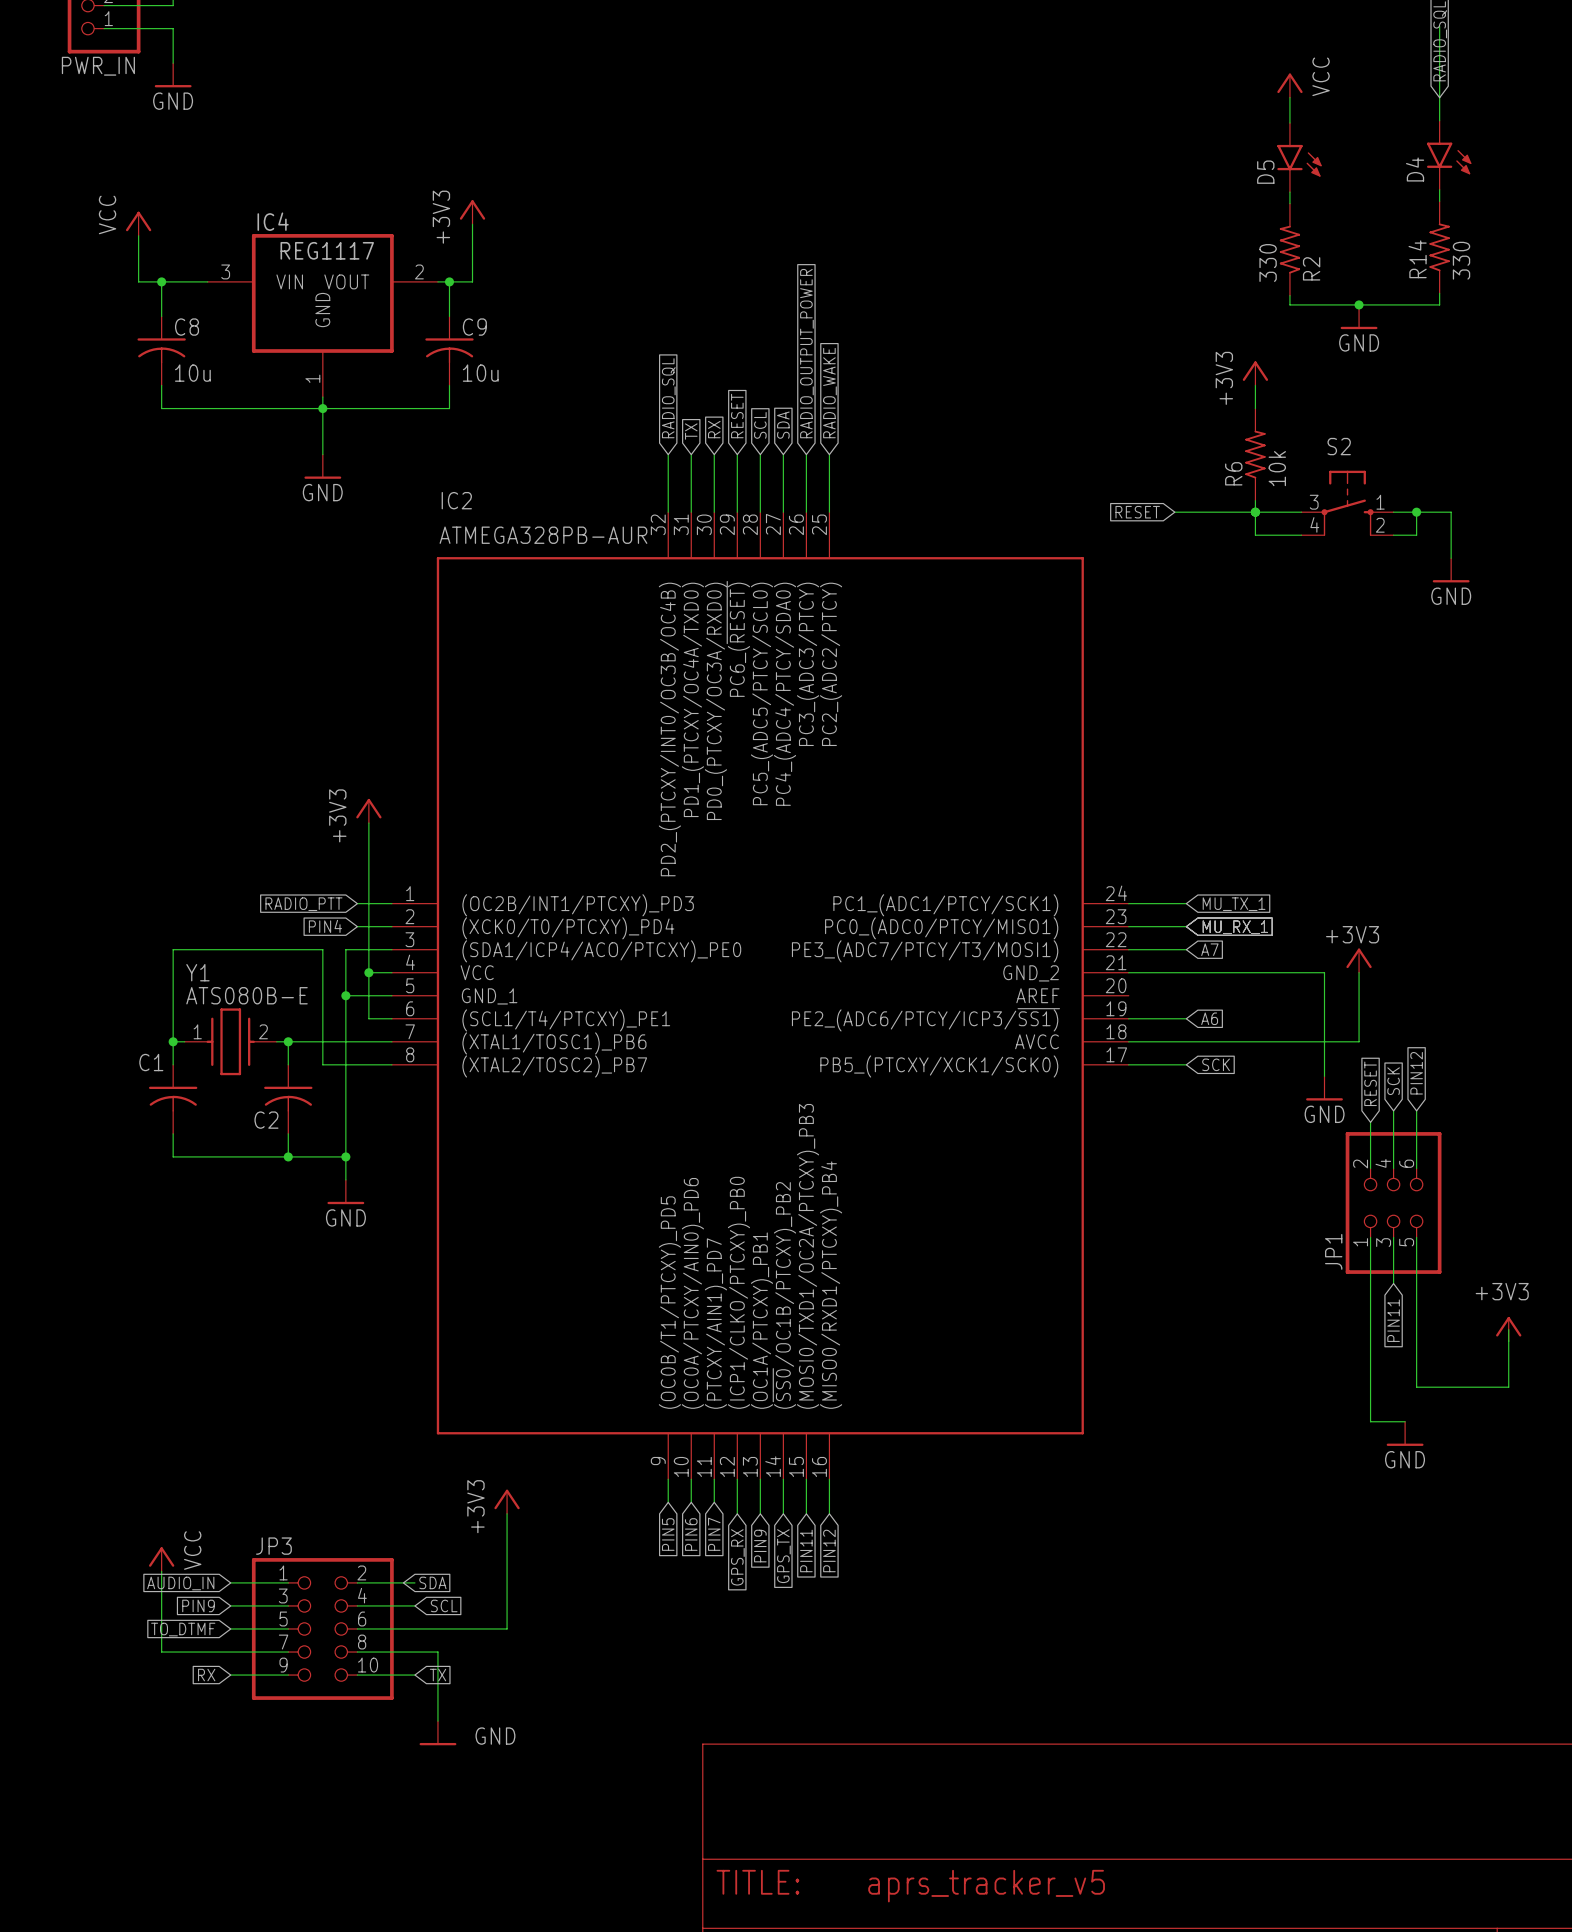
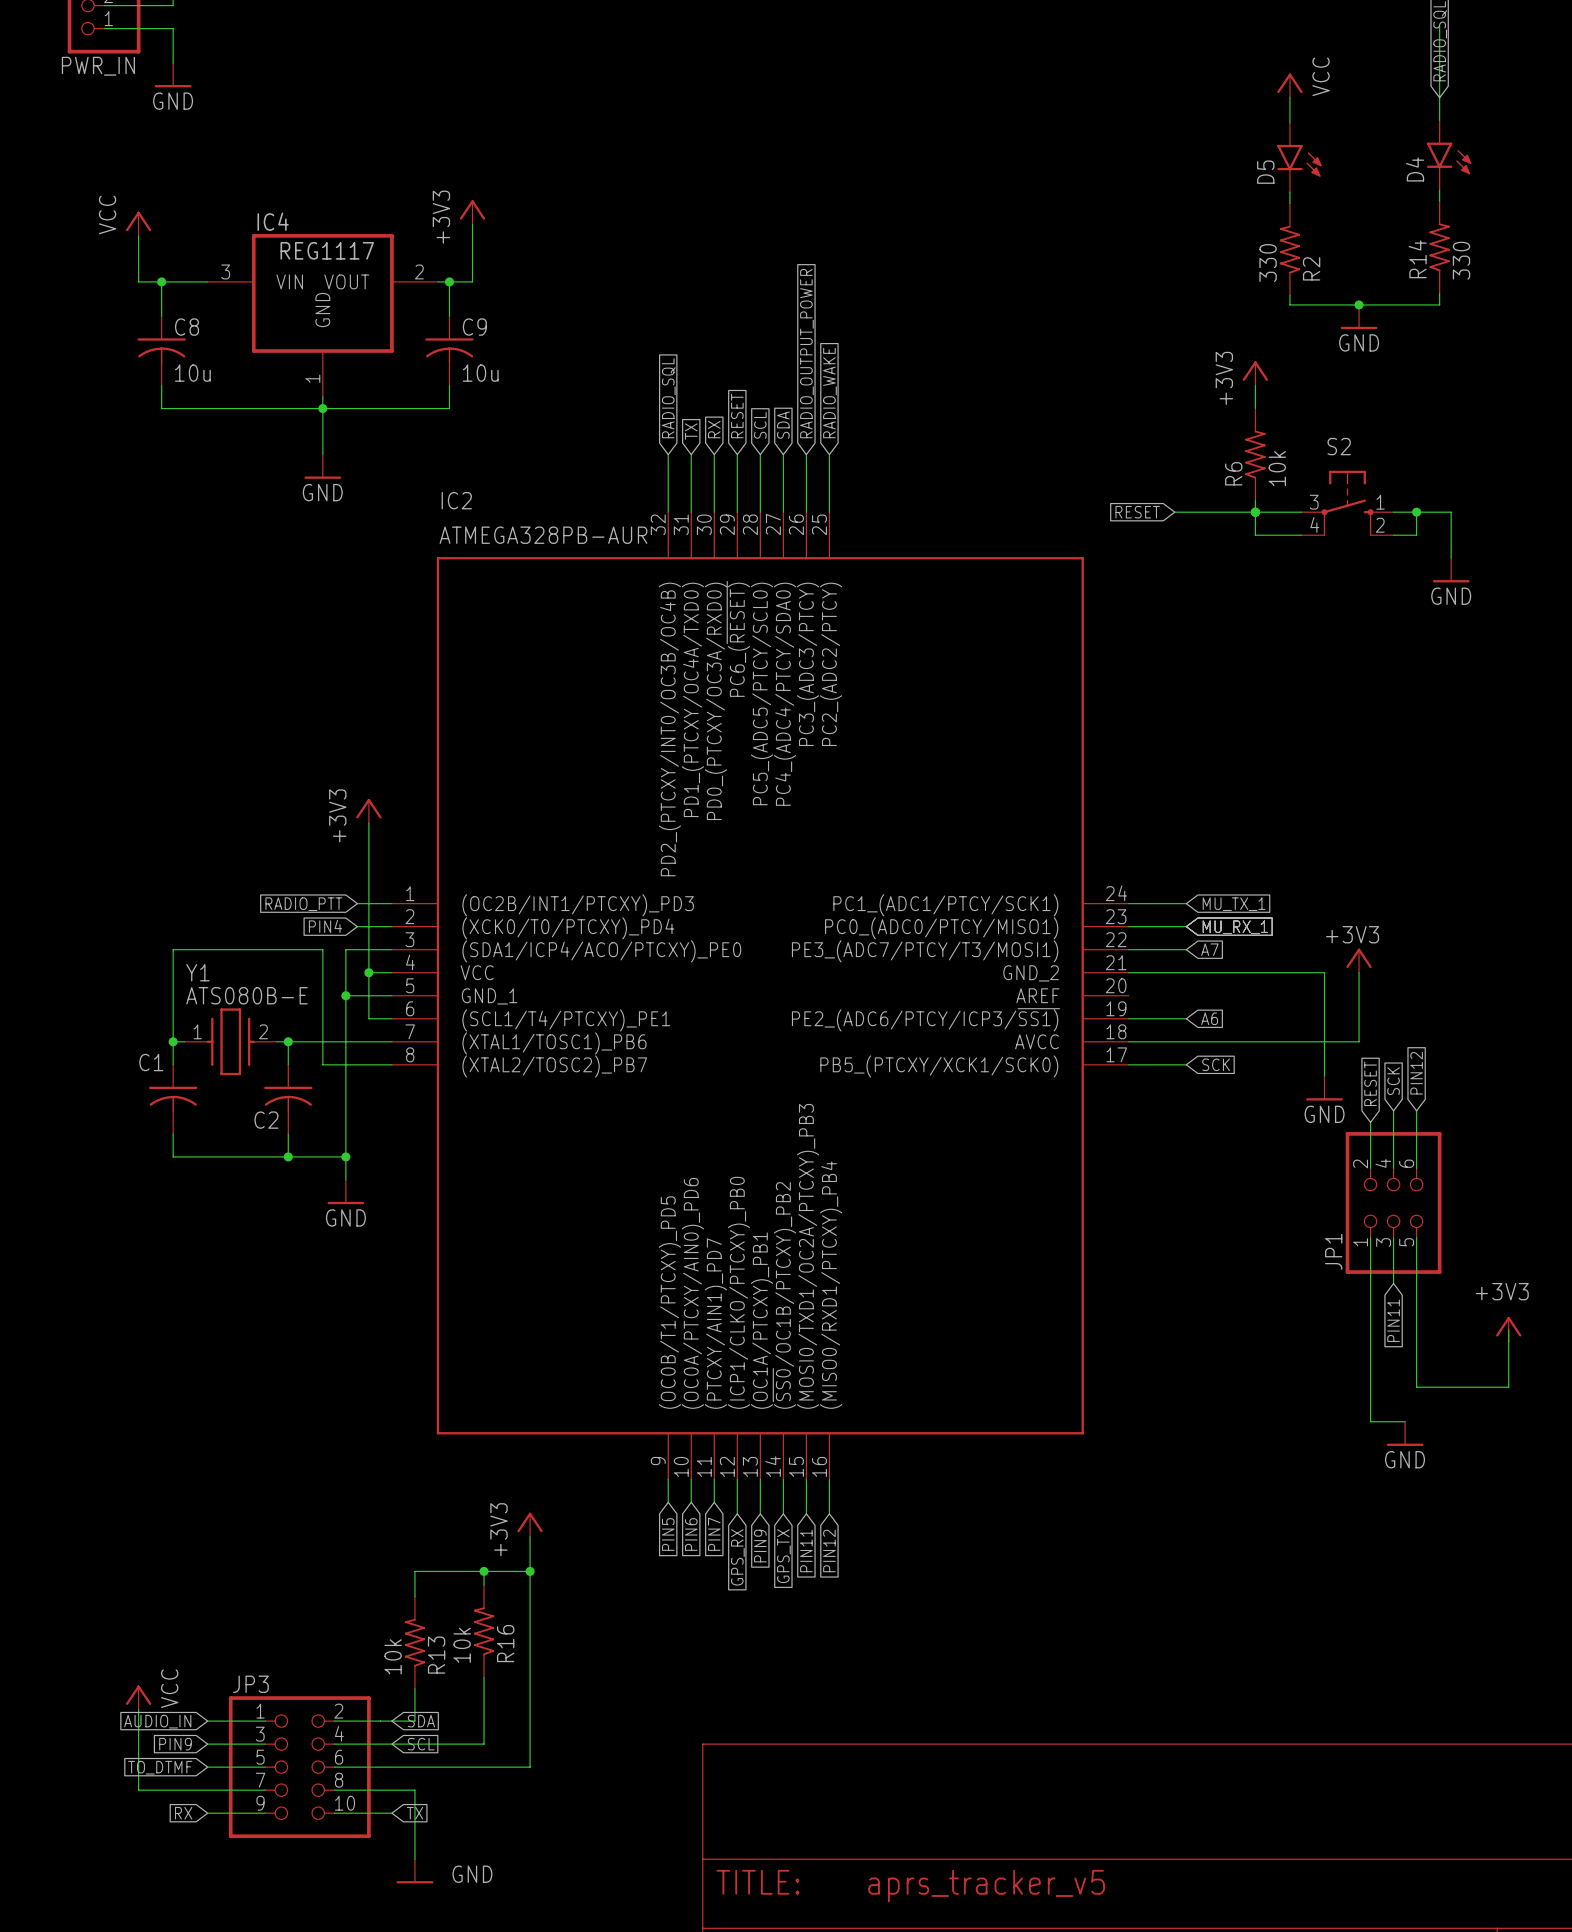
power symbol position: +3V3 (507, 1501) -> +3V3 (530, 1524)
wire: (507, 1513) (507, 1628) (357, 1628) -> none
wire: none -> (530, 1536) (530, 1767) (334, 1767)
power symbol position: VCC (161, 1559) -> VCC (138, 1697)
wire: (161, 1571) (161, 1652) (288, 1652) -> (138, 1709) (138, 1790) (265, 1790)
wire: none -> (484, 1571) (484, 1585)
junction: none -> (484, 1571)
wire: none -> (530, 1571) (414, 1571) (414, 1596)
junction: none -> (530, 1571)
wire: (230, 1582) (288, 1582) -> (207, 1721) (265, 1721)
wire: (357, 1582) (414, 1582) -> none
global label position: SDA (432, 1582) -> SDA (421, 1721)
global label position: AUDIO_IN (180, 1583) -> AUDIO_IN (157, 1721)
global label position: PIN9 (198, 1605) -> PIN9 (175, 1744)
wire: (230, 1605) (288, 1605) -> (207, 1744) (265, 1744)
wire: (357, 1605) (414, 1605) -> none
global label position: SCL (444, 1605) -> SCL (421, 1744)
wire: (230, 1628) (288, 1628) -> (207, 1767) (265, 1767)
JP3 position: (322, 1628) -> (299, 1767)
global label position: TO_DTMF (183, 1629) -> TO_DTMF (160, 1767)
R16: none -> 10k (484, 1631)
R13: none -> 10k (414, 1642)
wire: (357, 1652) (437, 1652) (437, 1721) -> (334, 1790) (414, 1790) (414, 1859)
global label position: RX (206, 1675) -> RX (183, 1813)
wire: (230, 1675) (288, 1675) -> (207, 1813) (265, 1813)
wire: (357, 1675) (414, 1675) -> (334, 1813) (391, 1813)
global label position: TX (438, 1675) -> TX (414, 1813)
wire: none -> (484, 1677) (484, 1744) (334, 1744)
wire: none -> (414, 1688) (414, 1721) (334, 1721)
power symbol position: GND (437, 1733) -> GND (414, 1871)

